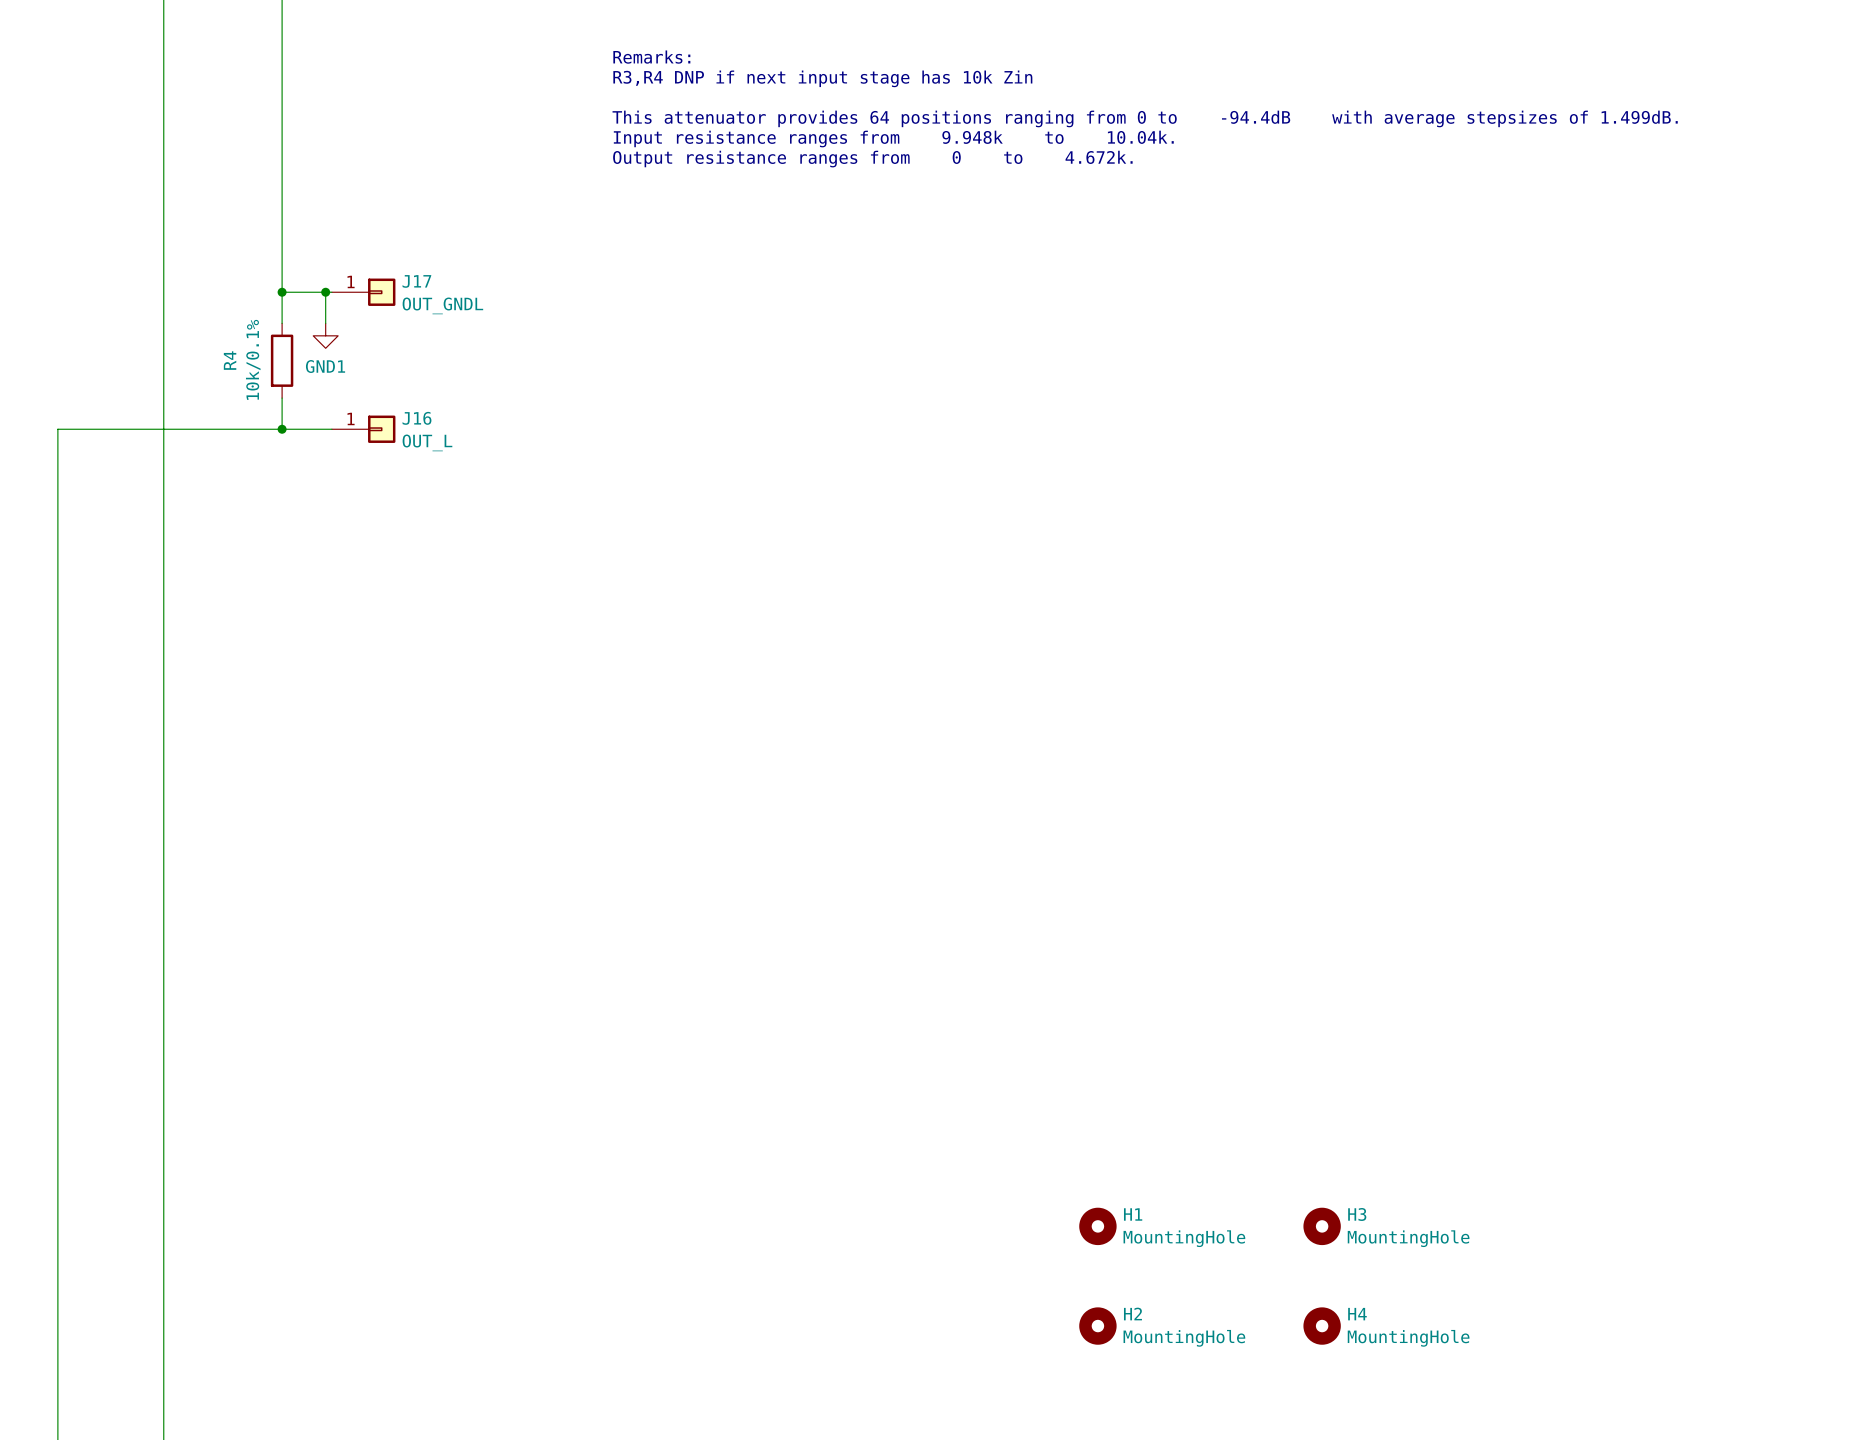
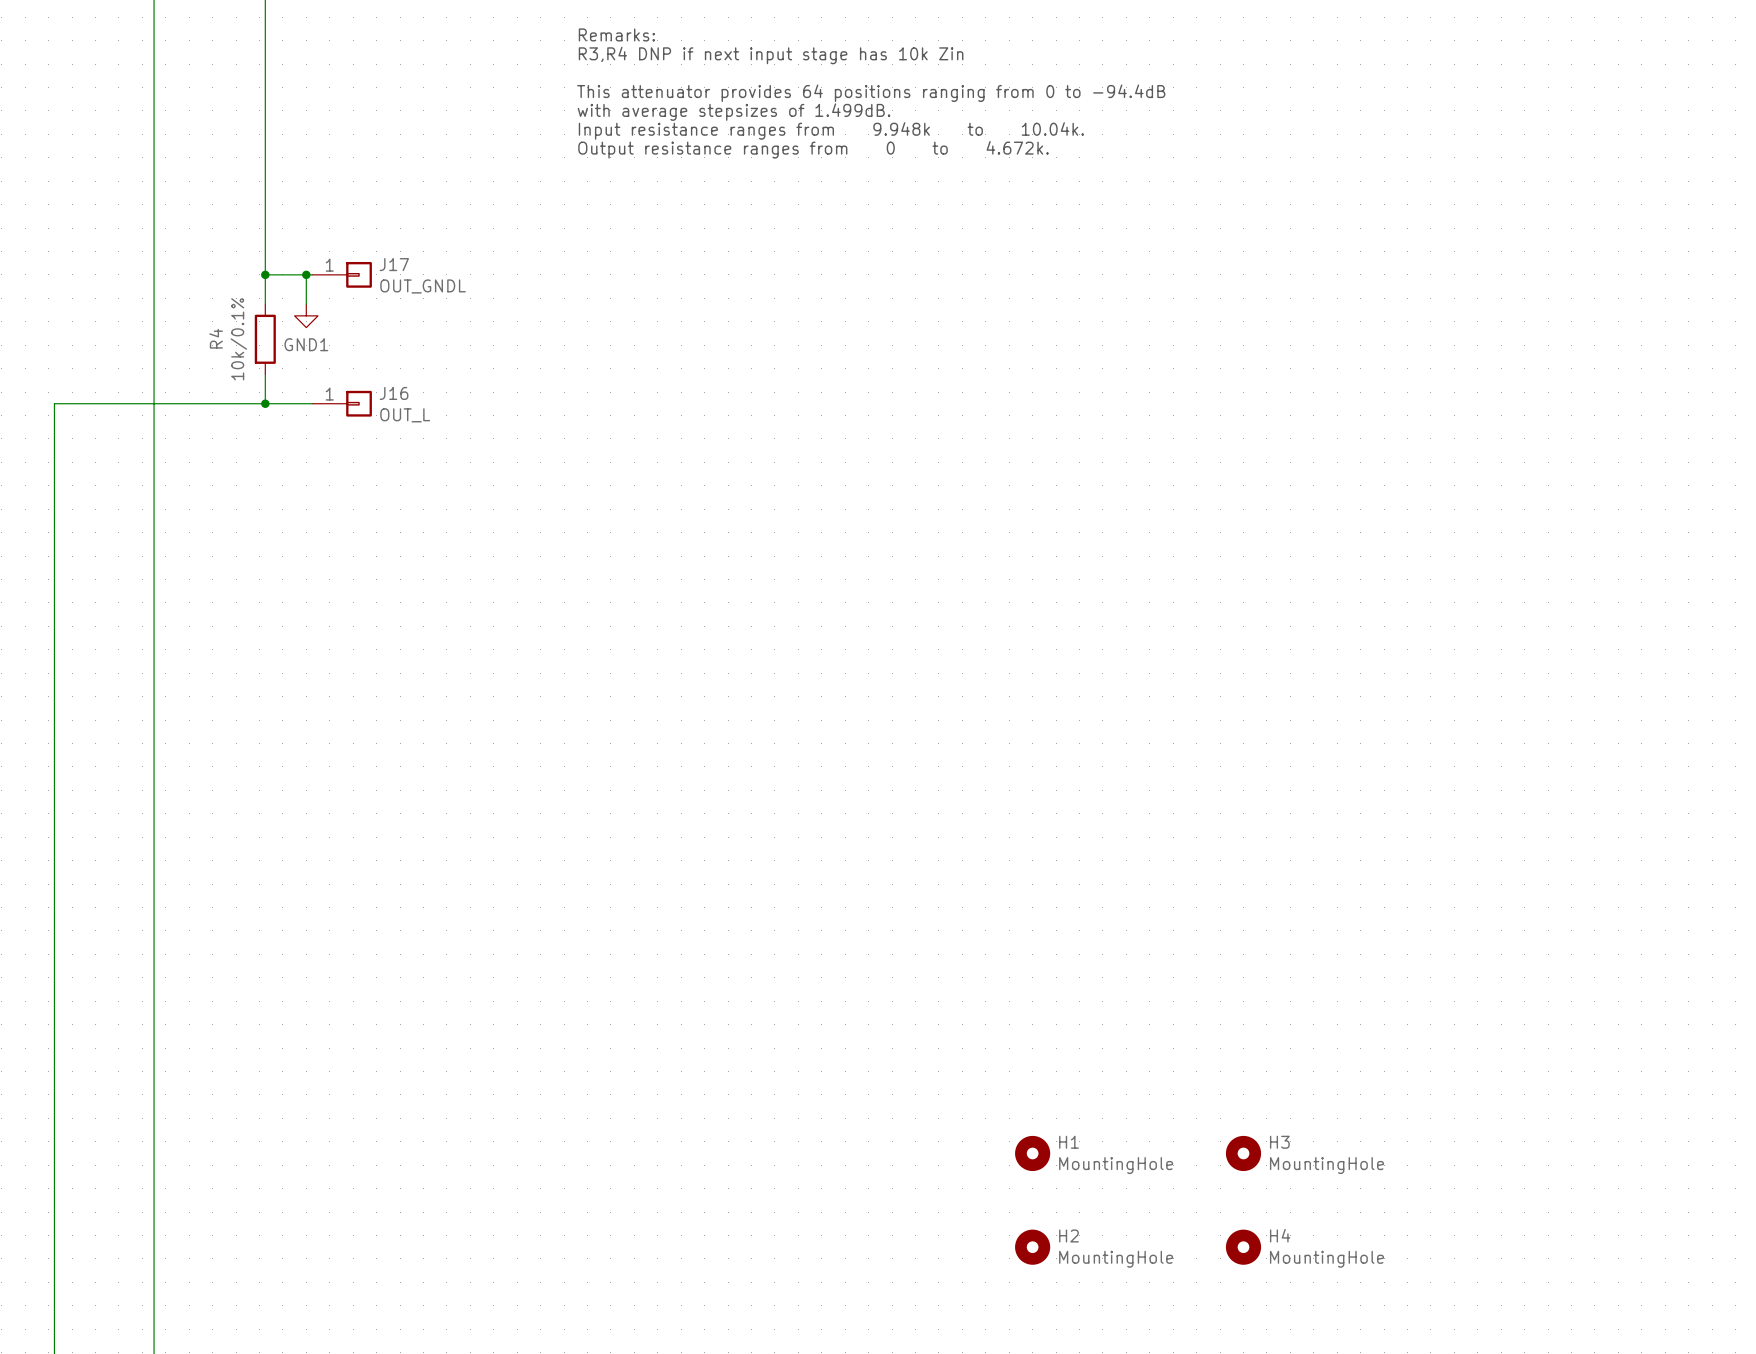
text: none -> Remarks: (616, 34)
text: Remarks: (651, 57) -> R3,R4 DNP if next input stage has 10k Zin (771, 55)
text: R3,R4 DNP if next input stage has 10k Zin (822, 78) -> none
text: none -> This attenuator provides 64 positions ranging from 0 to -94.4dB (871, 93)
text: This attenuator provides 64 positions ranging from 0 to -94.4dB with average stepsizes of 1.499dB. (1145, 118) -> with average stepsizes of 1.499dB. (733, 112)

